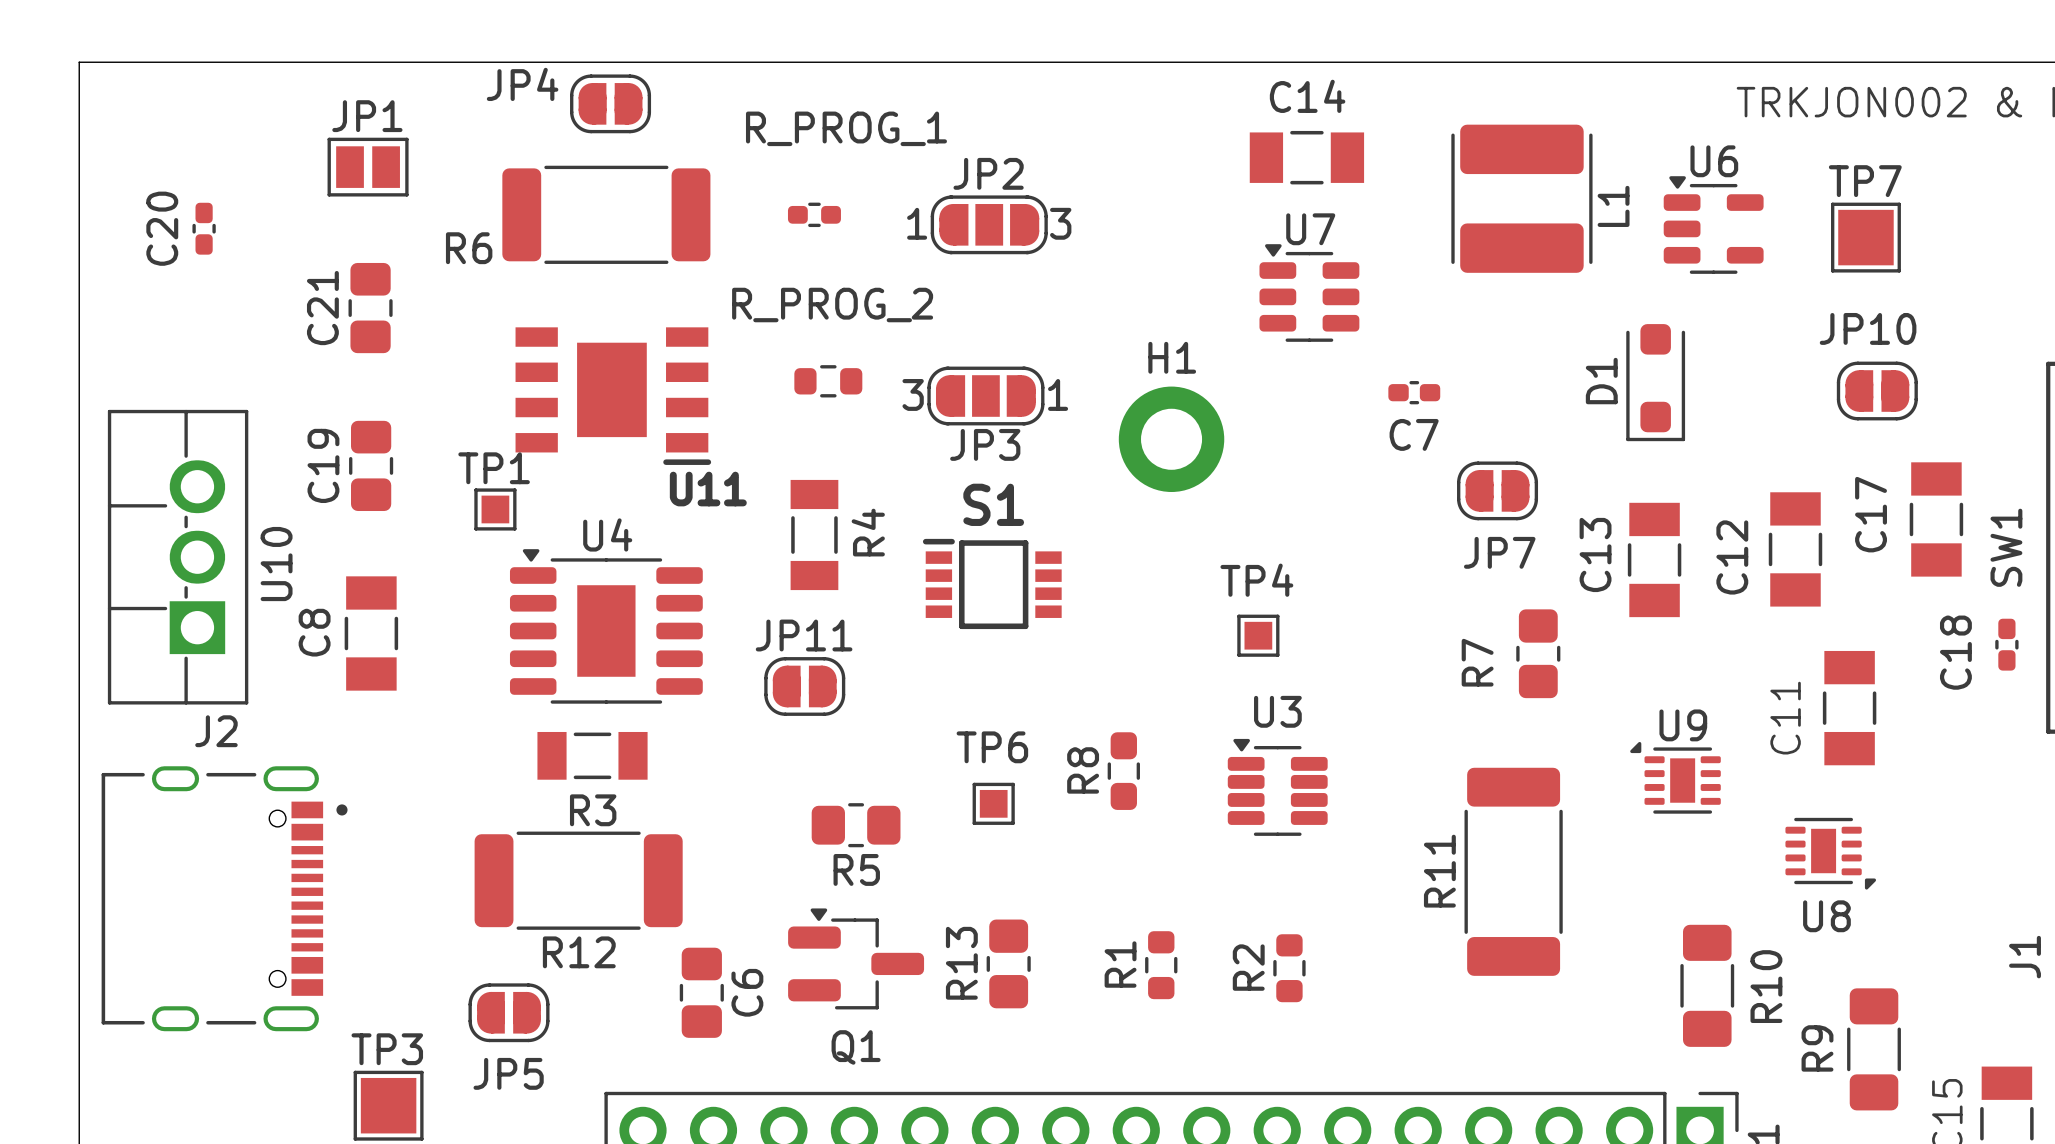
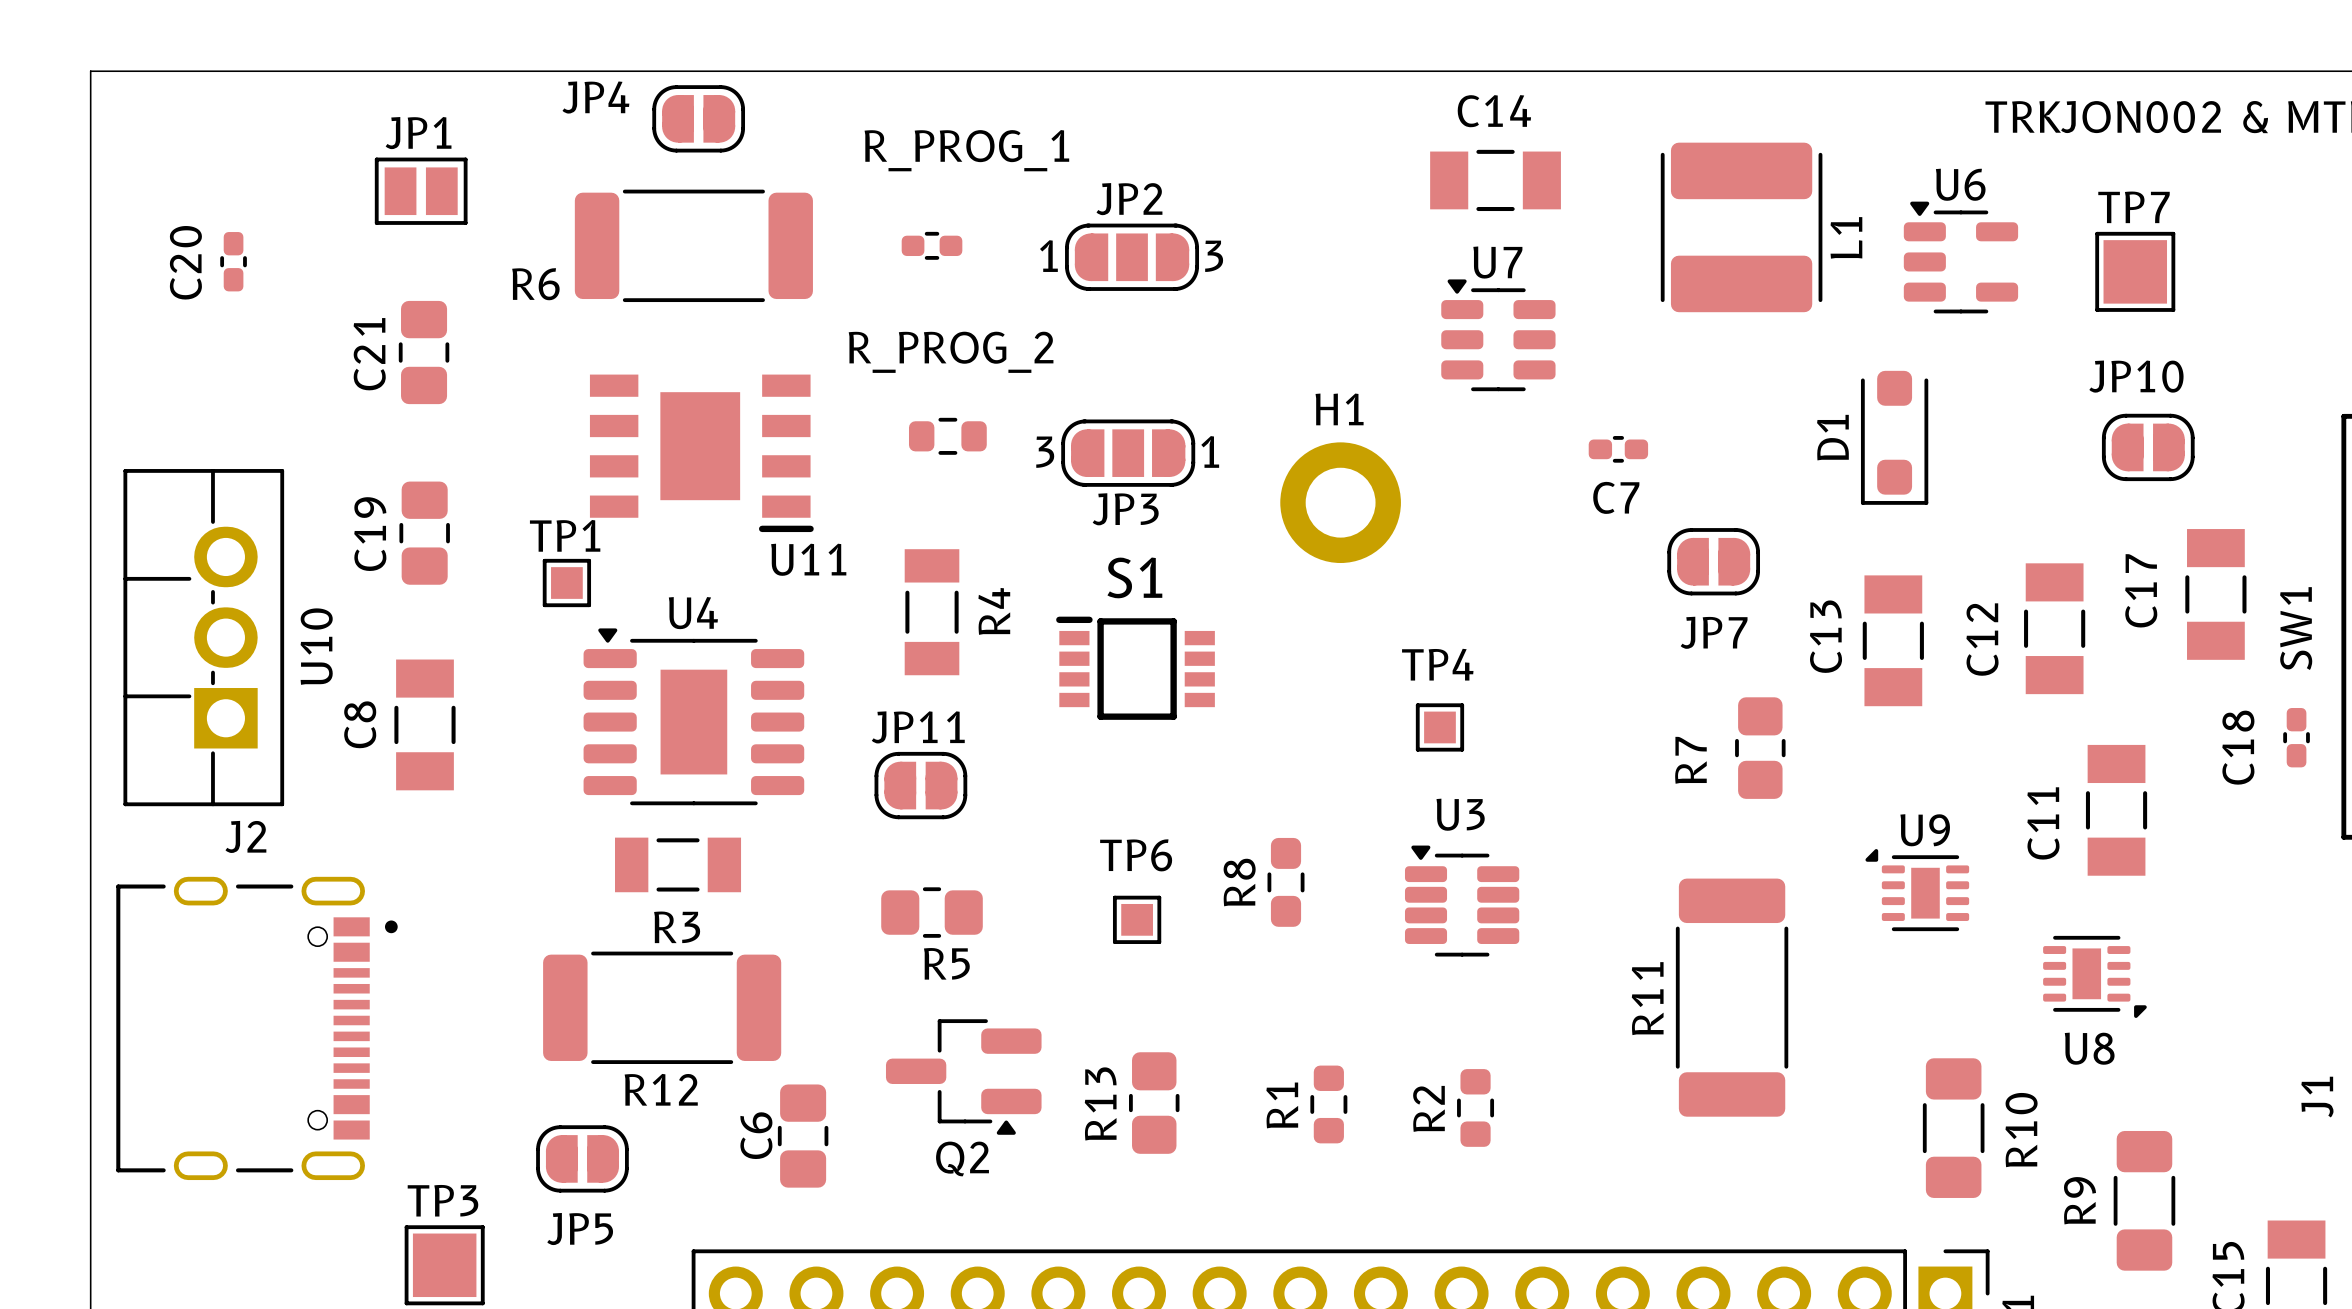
R5 position: (856, 825) -> (932, 912)
R5 name position: R5 (856, 869) -> R5 (946, 963)
Q2: none -> (963, 1077)
Q1: (856, 958) -> none
C6 name position: C6 (747, 992) -> C6 (756, 1135)

